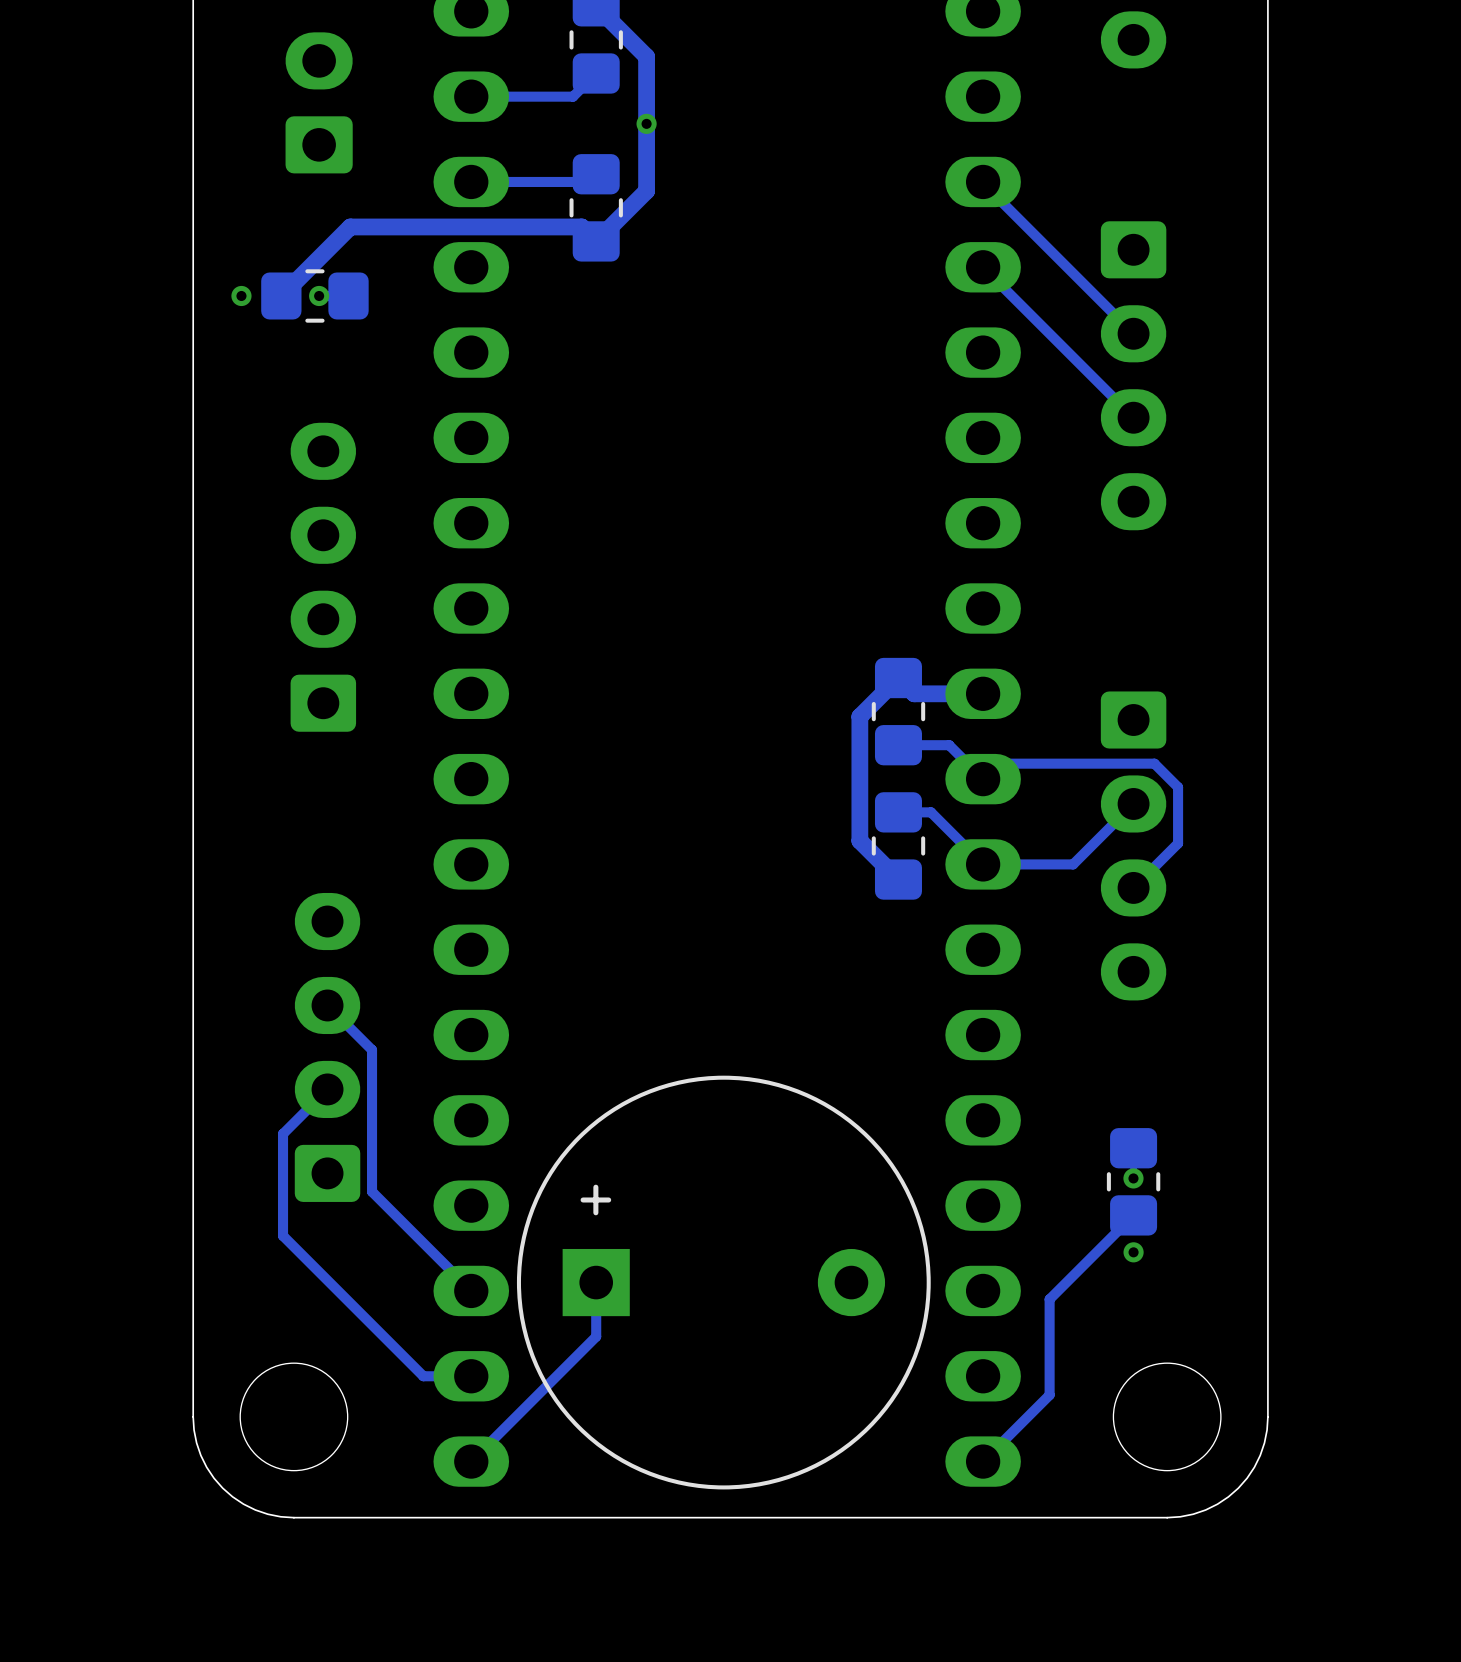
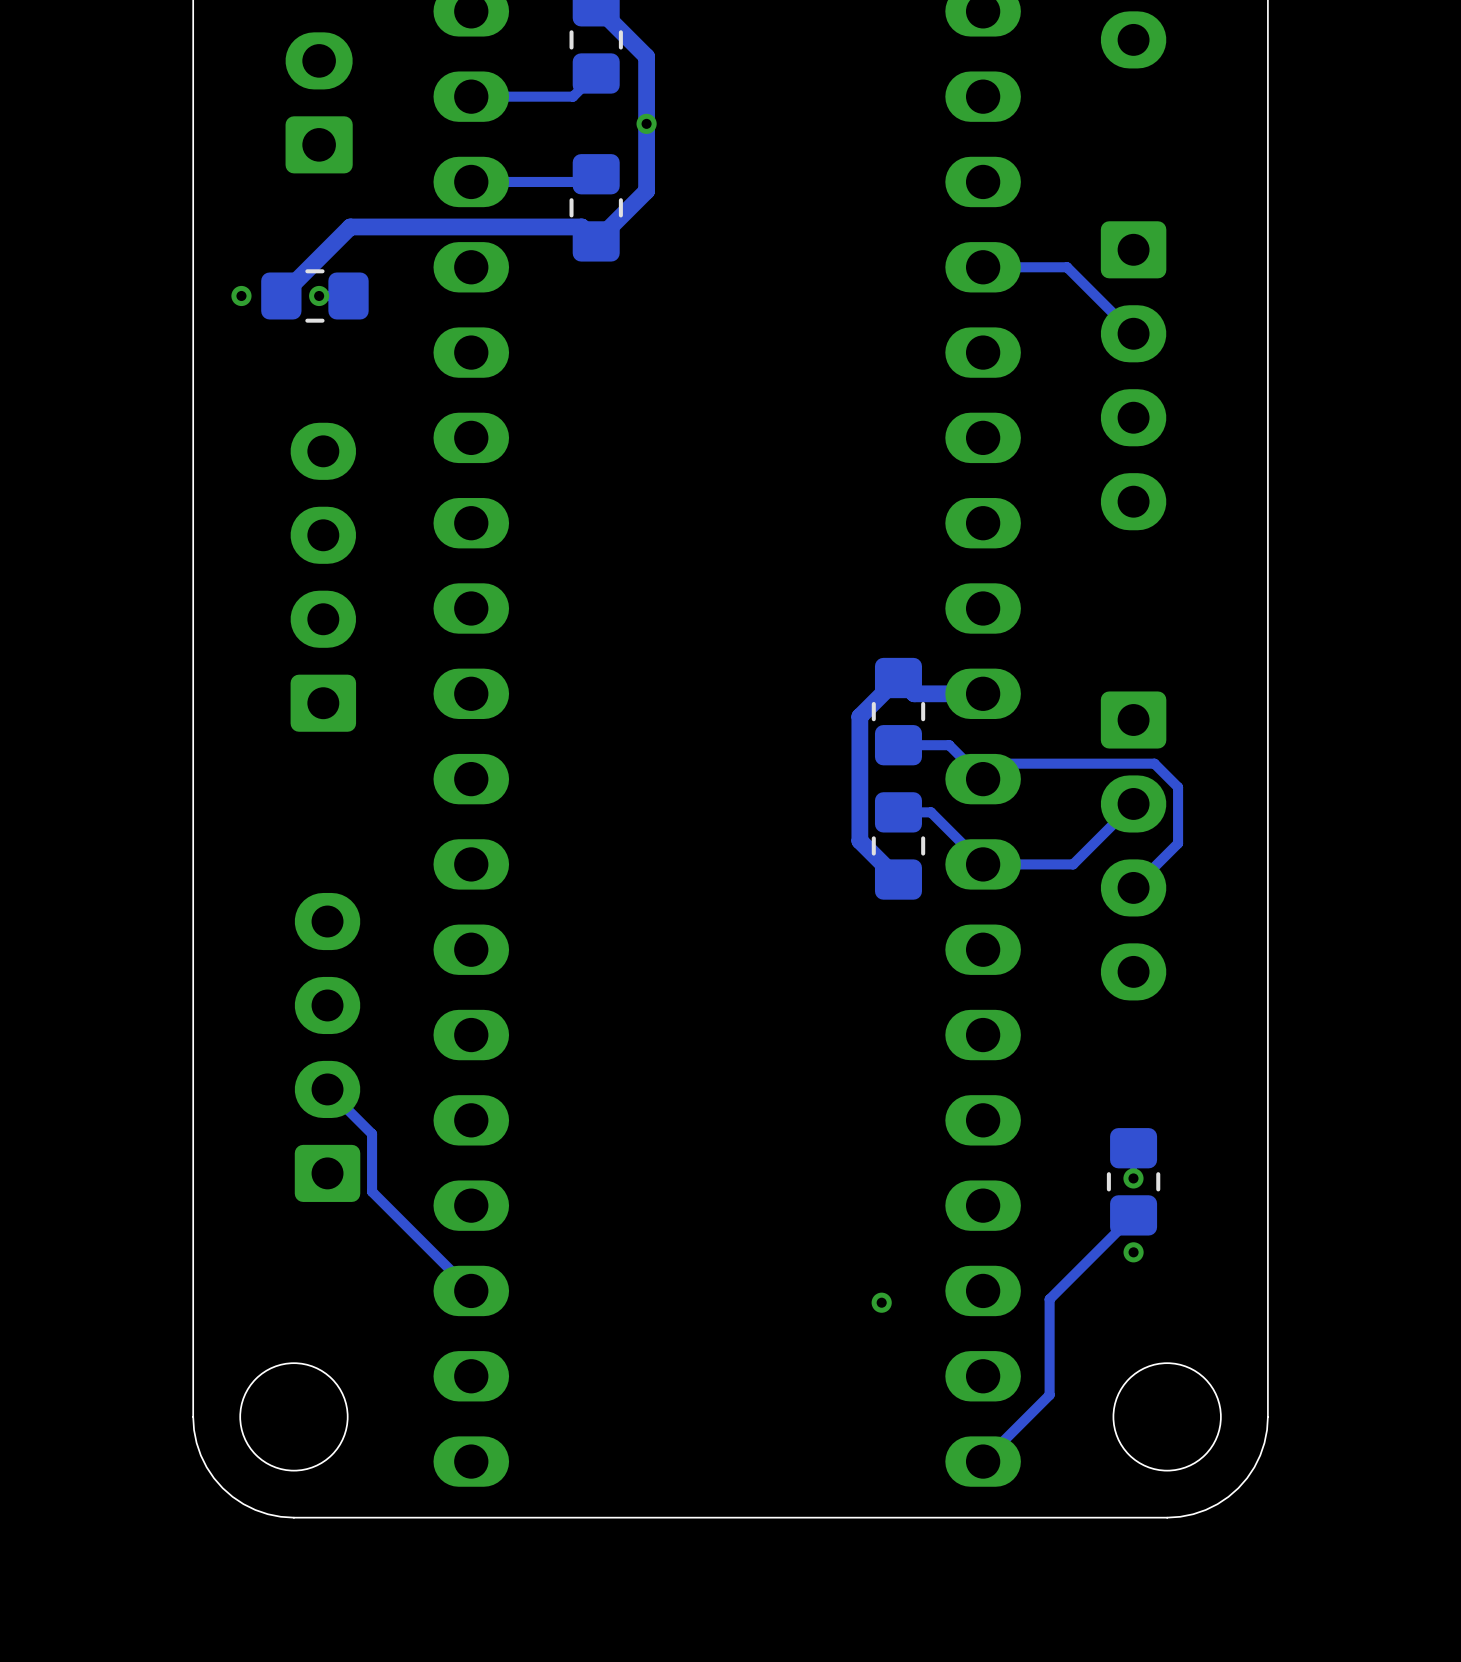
track: (983, 183) (1067, 267) -> (983, 267) (1067, 267)
track: (983, 267) (1133, 417) -> none
track: (327, 1005) (372, 1049) (372, 1191) -> (327, 1089) (372, 1133) (372, 1191)
track: (327, 1089) (283, 1133) (283, 1235) (423, 1376) (471, 1376) -> none
track: (596, 1282) (596, 1336) (471, 1461) -> none
part: (723, 1282) -> none
via: none -> (881, 1302)

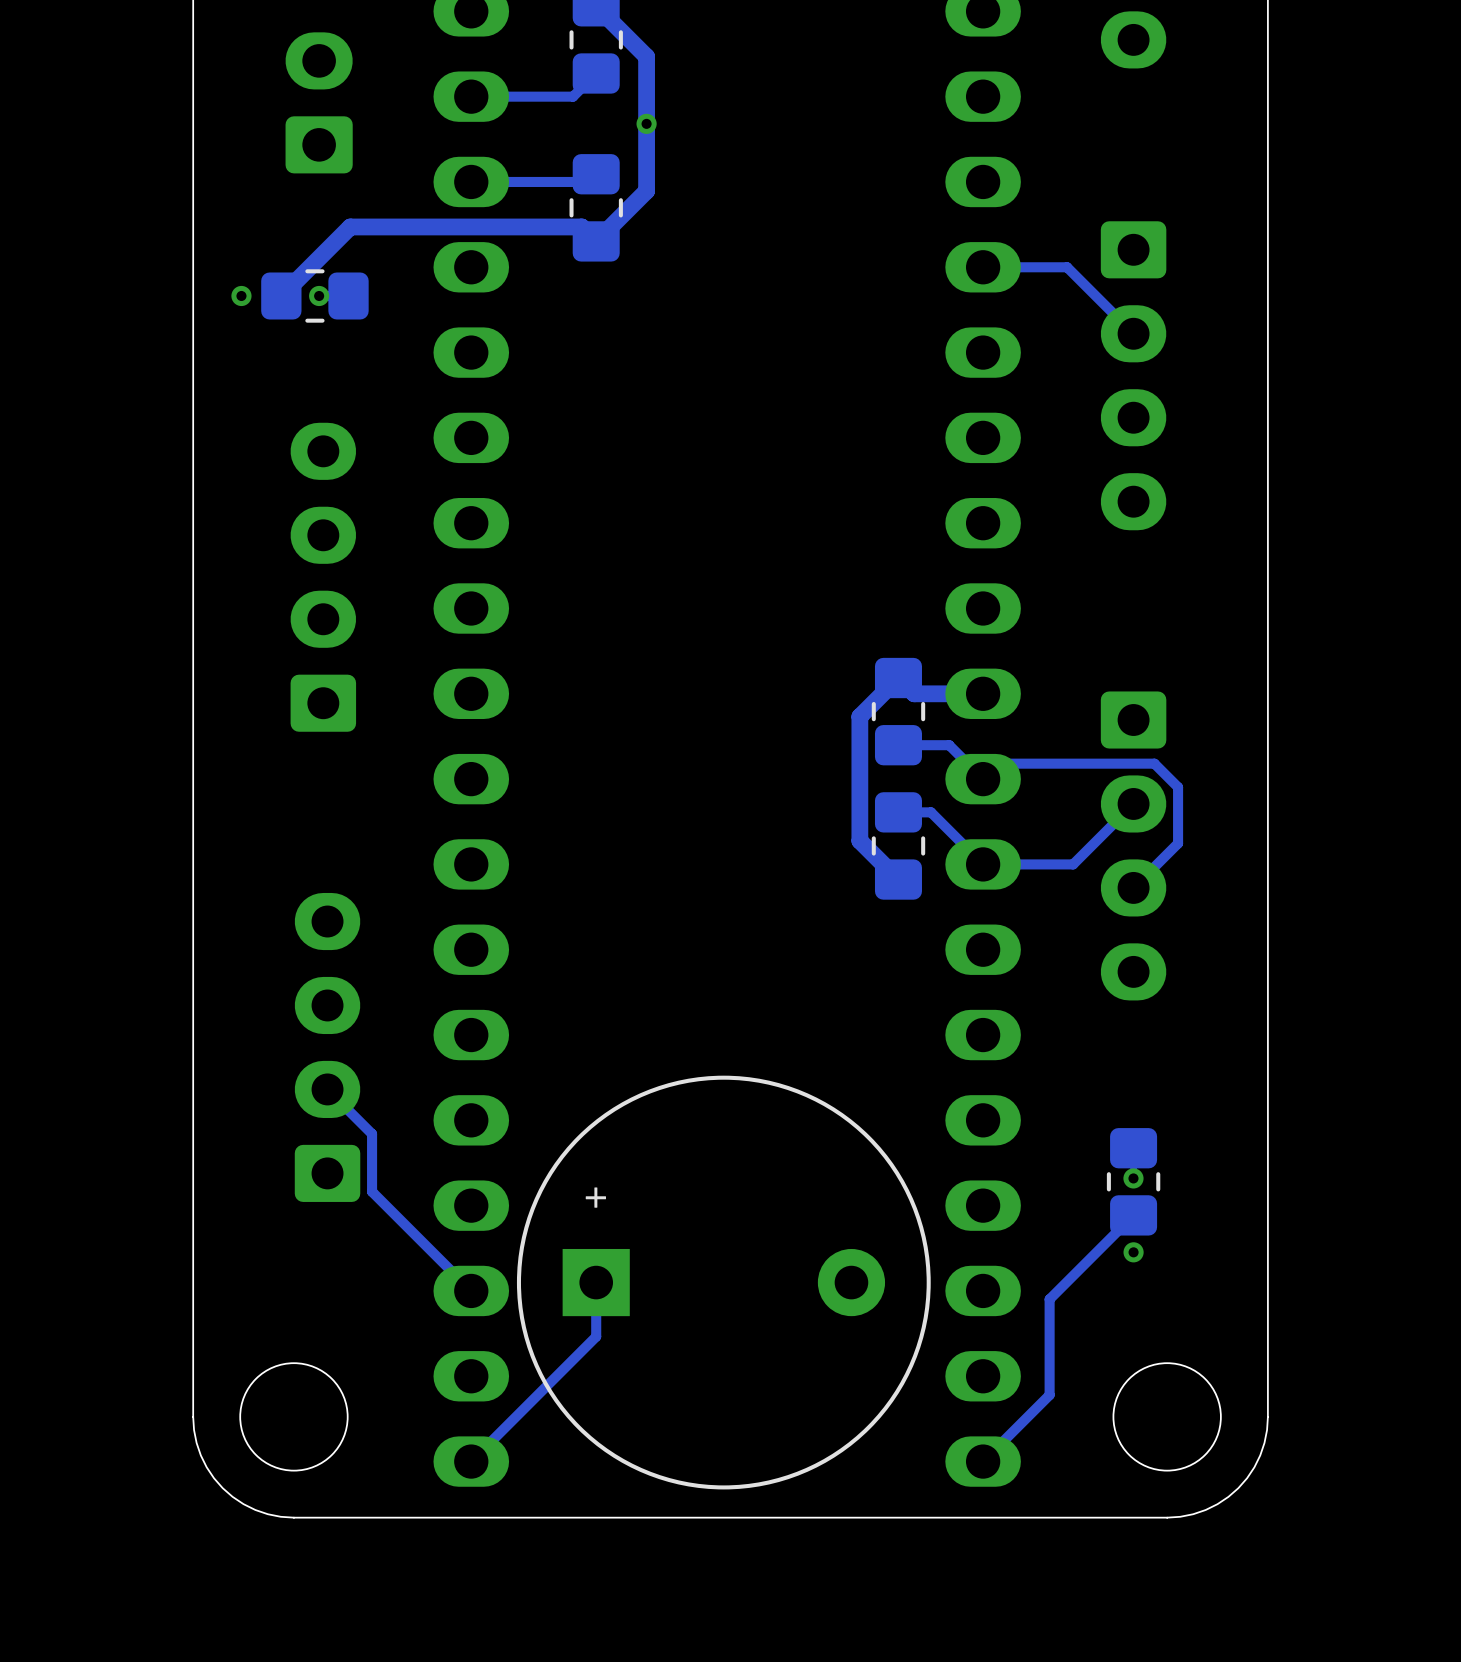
track: none -> (596, 1282) (596, 1336) (471, 1461)
part: none -> (723, 1282)
via: (881, 1302) -> none

